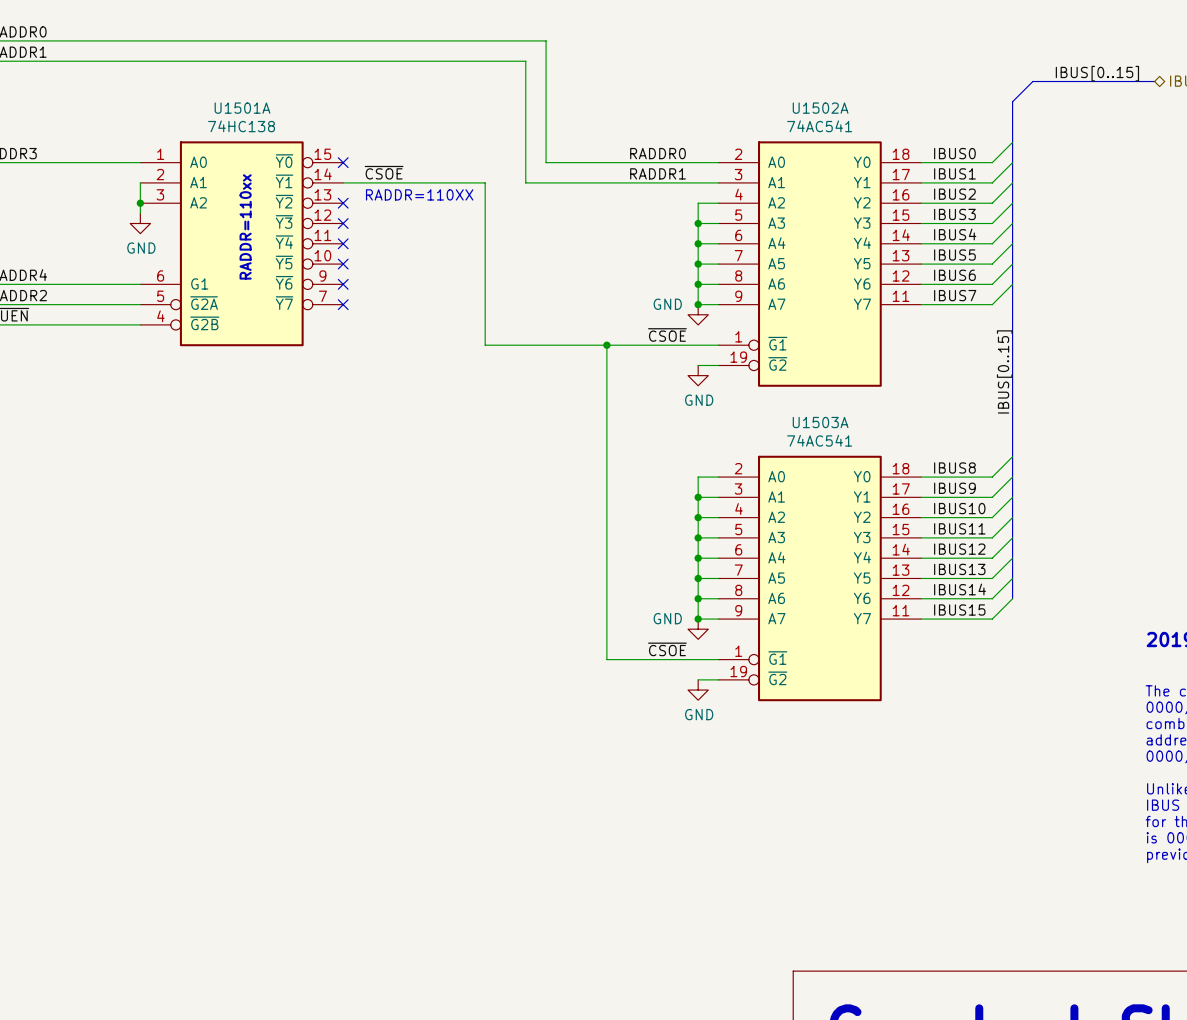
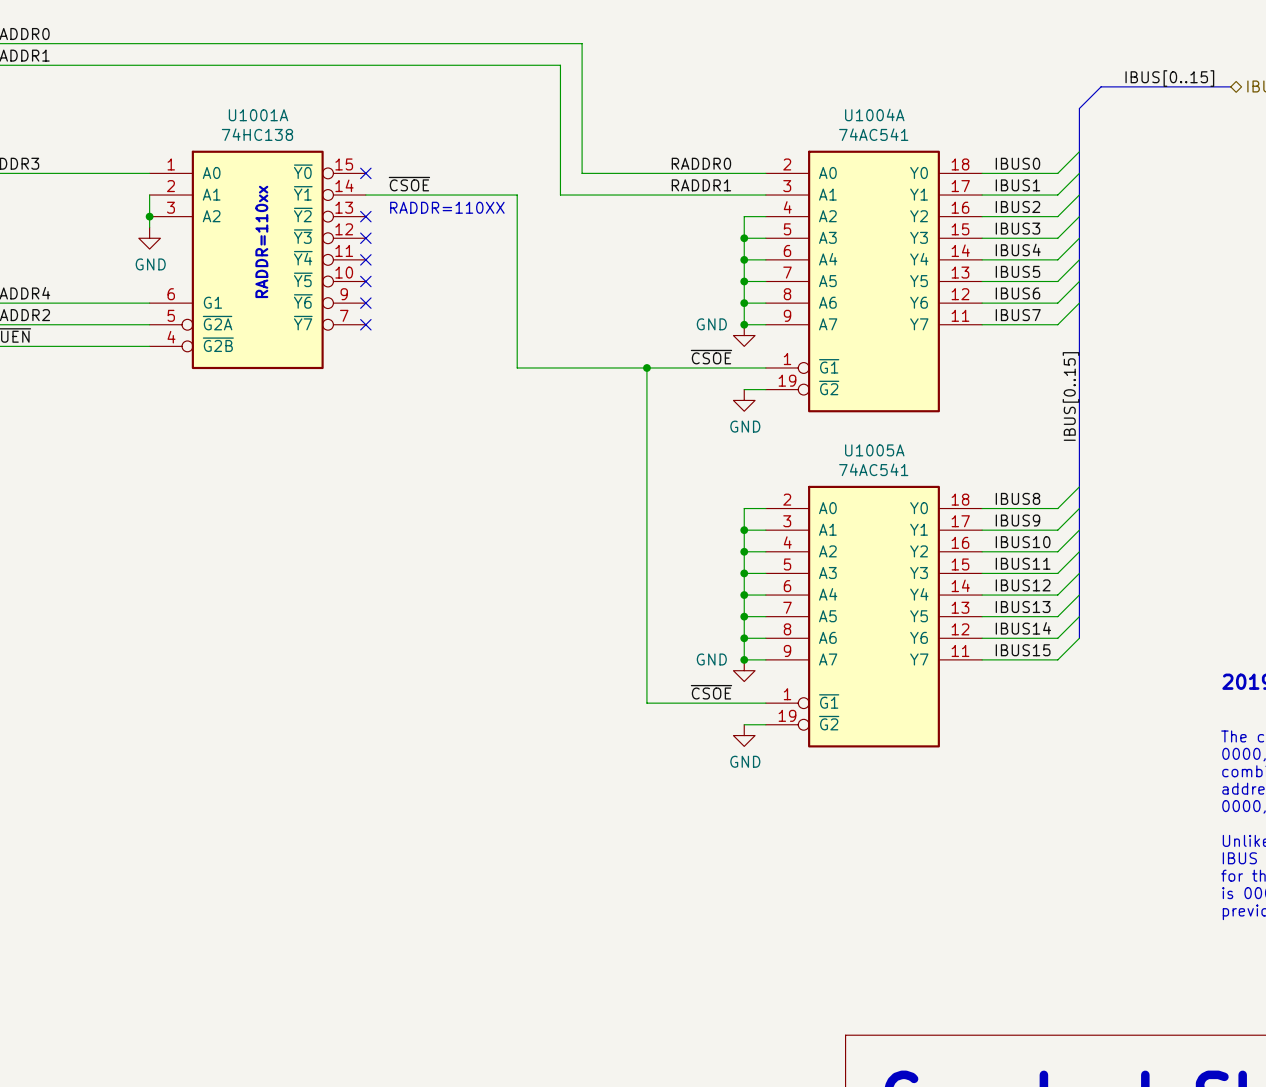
U1501A name: U1501A (242, 108) -> U1001A (258, 115)
U1502A name: U1502A (820, 108) -> U1004A (874, 114)
U1503A name: U1503A (820, 422) -> U1005A (874, 450)

